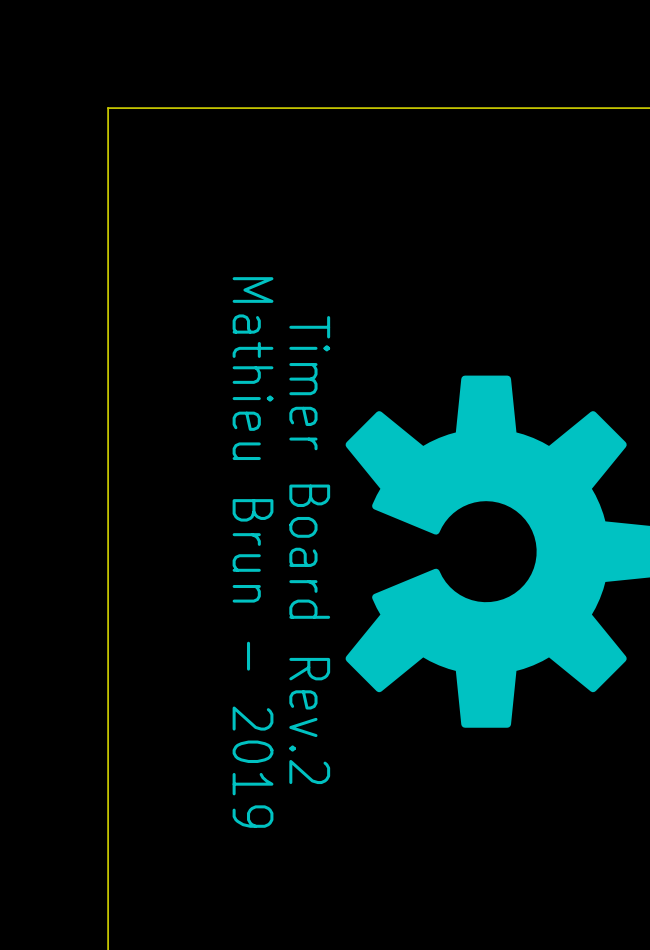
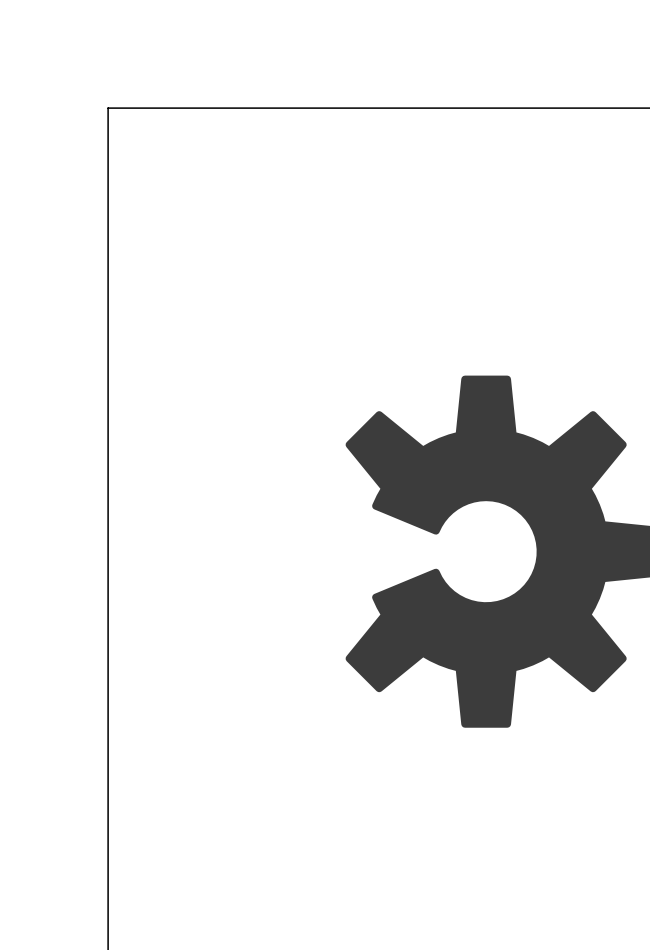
text: Timer Board Rev.2 (309, 550) -> none
text: Mathieu Brun - 2019 (253, 552) -> none

